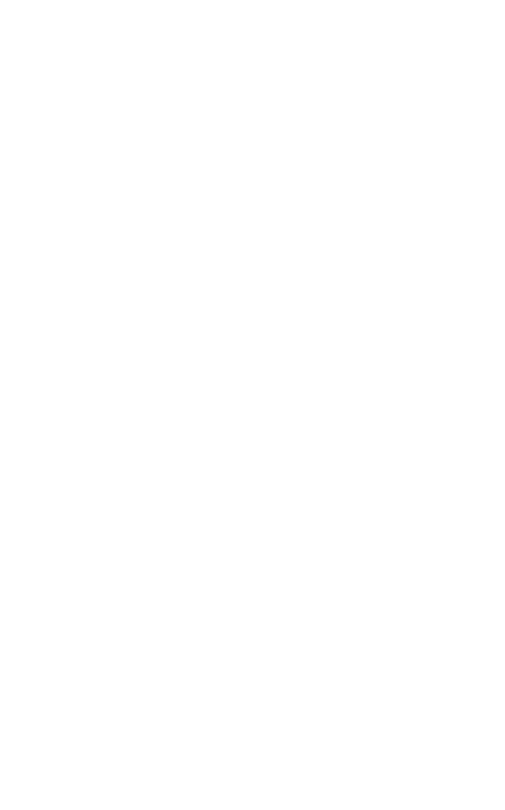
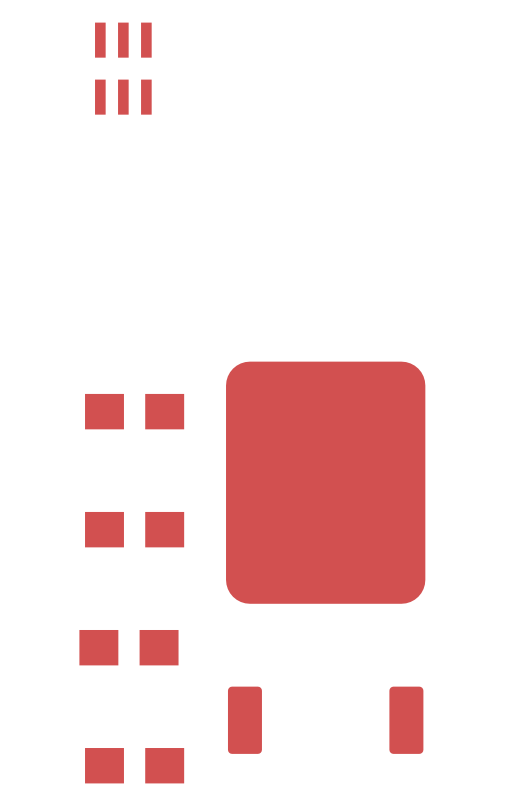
part: none -> (123, 68)
part: none -> (134, 411)
part: none -> (134, 529)
part: none -> (325, 557)
part: none -> (128, 647)
part: none -> (134, 765)

